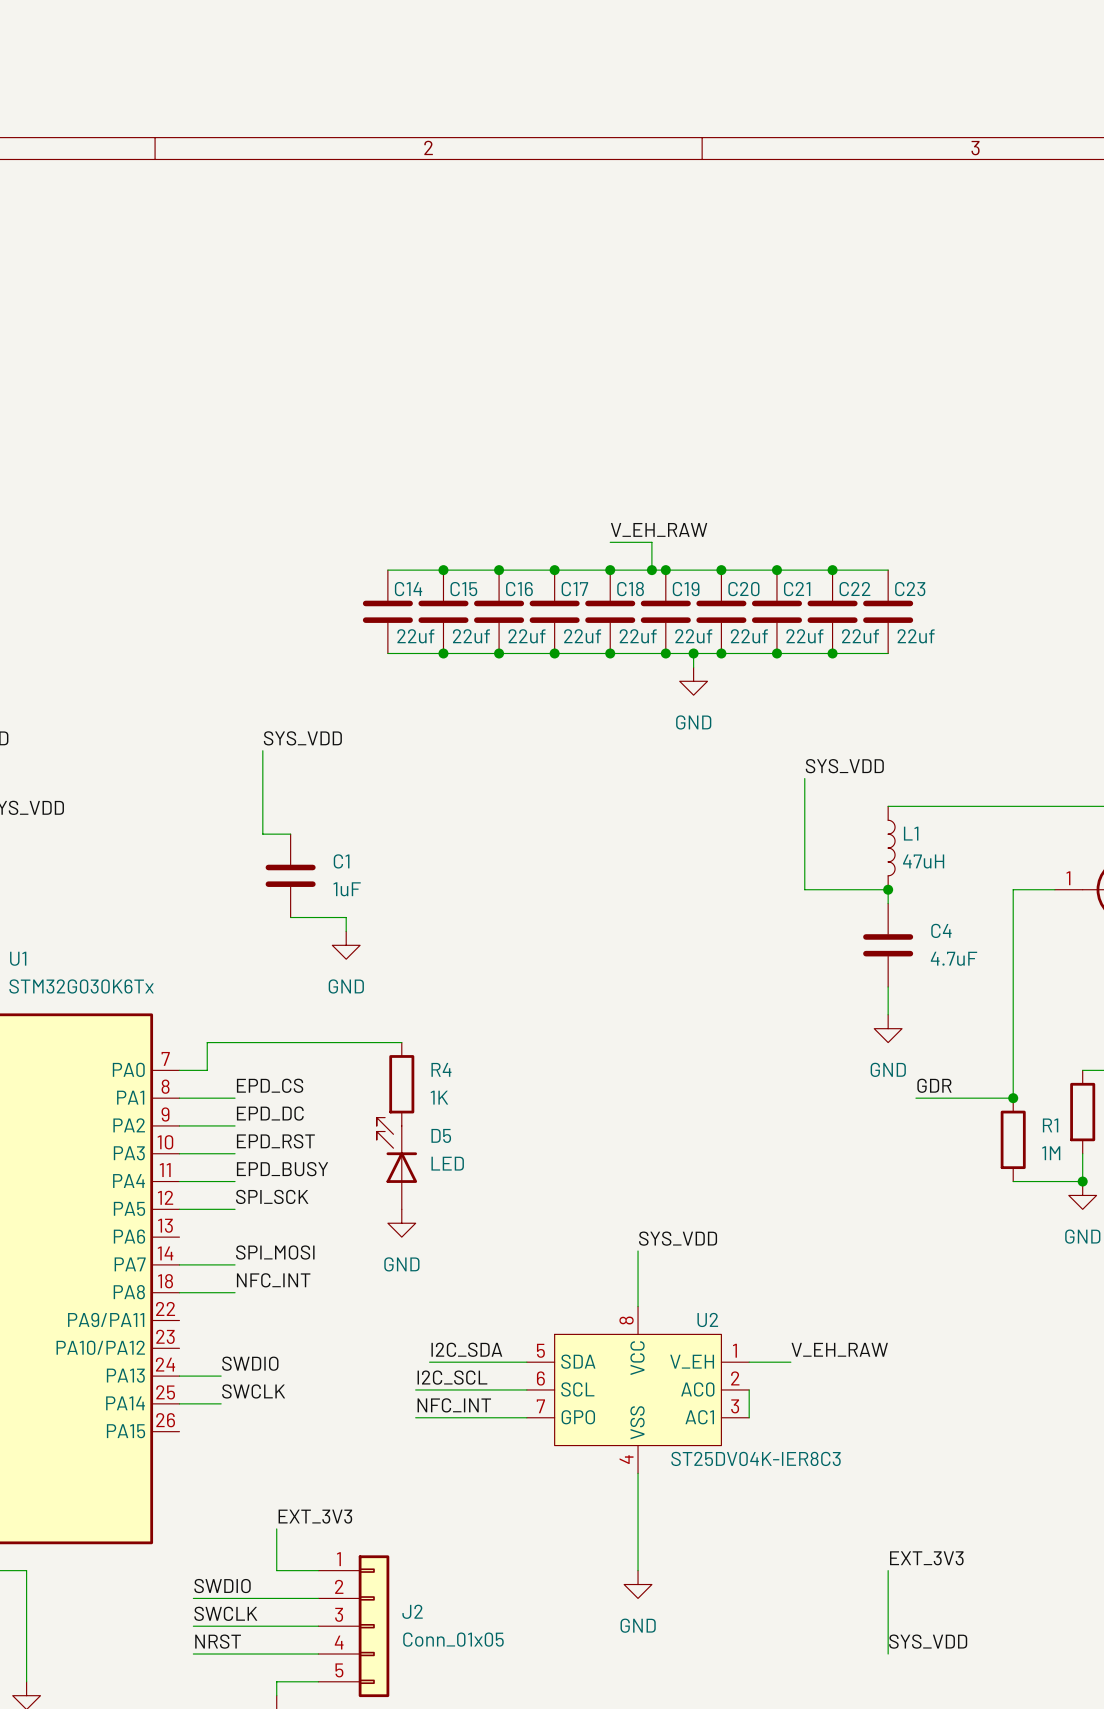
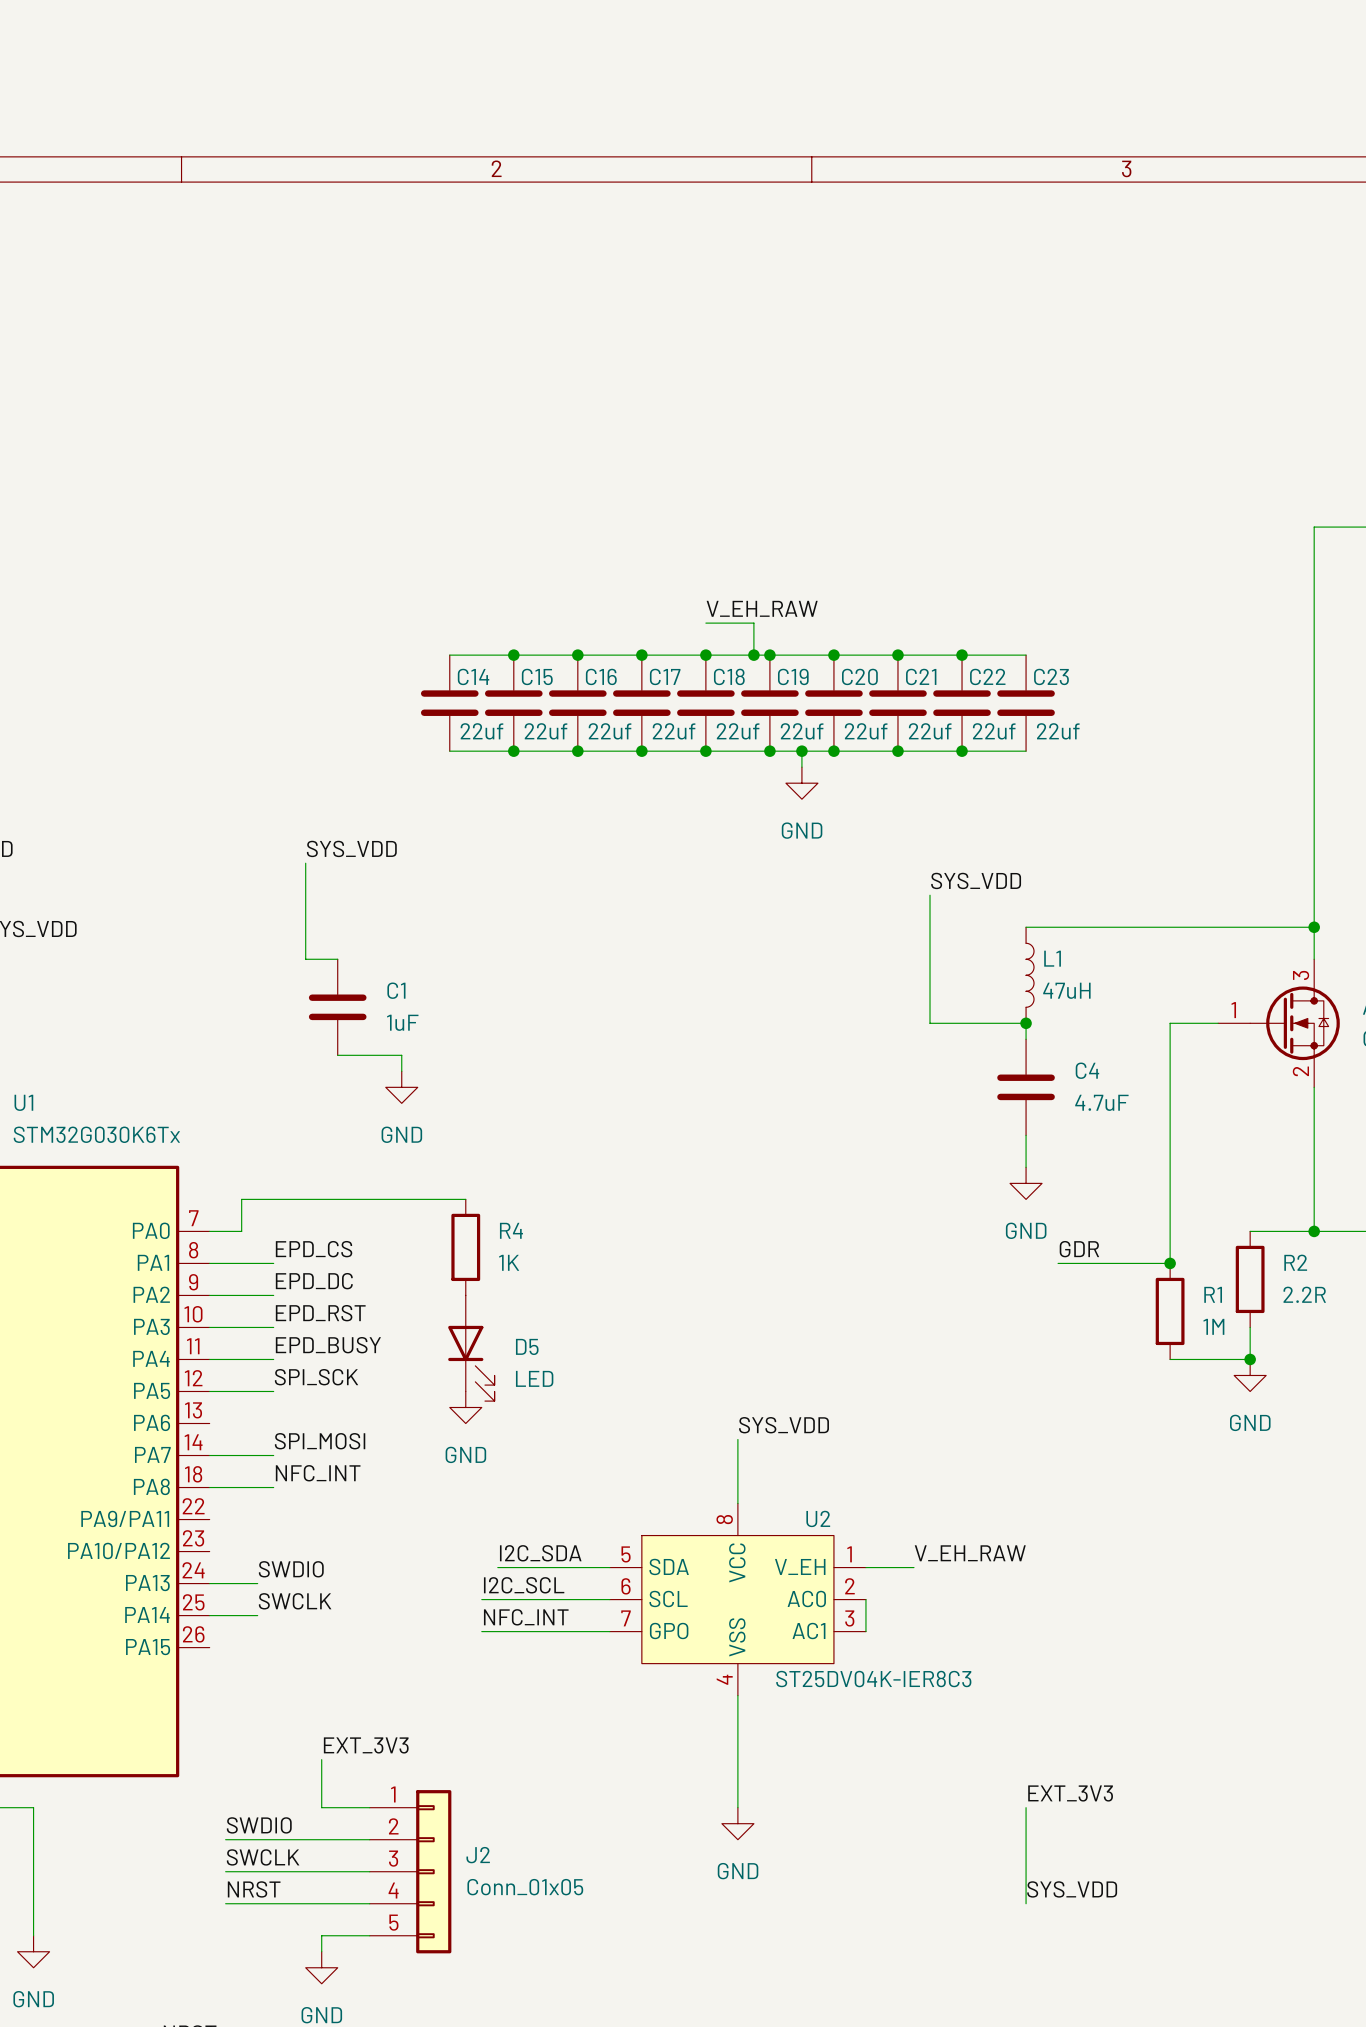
D5 name position: D5 (441, 1135) -> D5 (527, 1346)
D5 rotation: 0° (396, 1150) -> 180° (471, 1363)
D5 value position: LED (447, 1163) -> LED (534, 1378)

